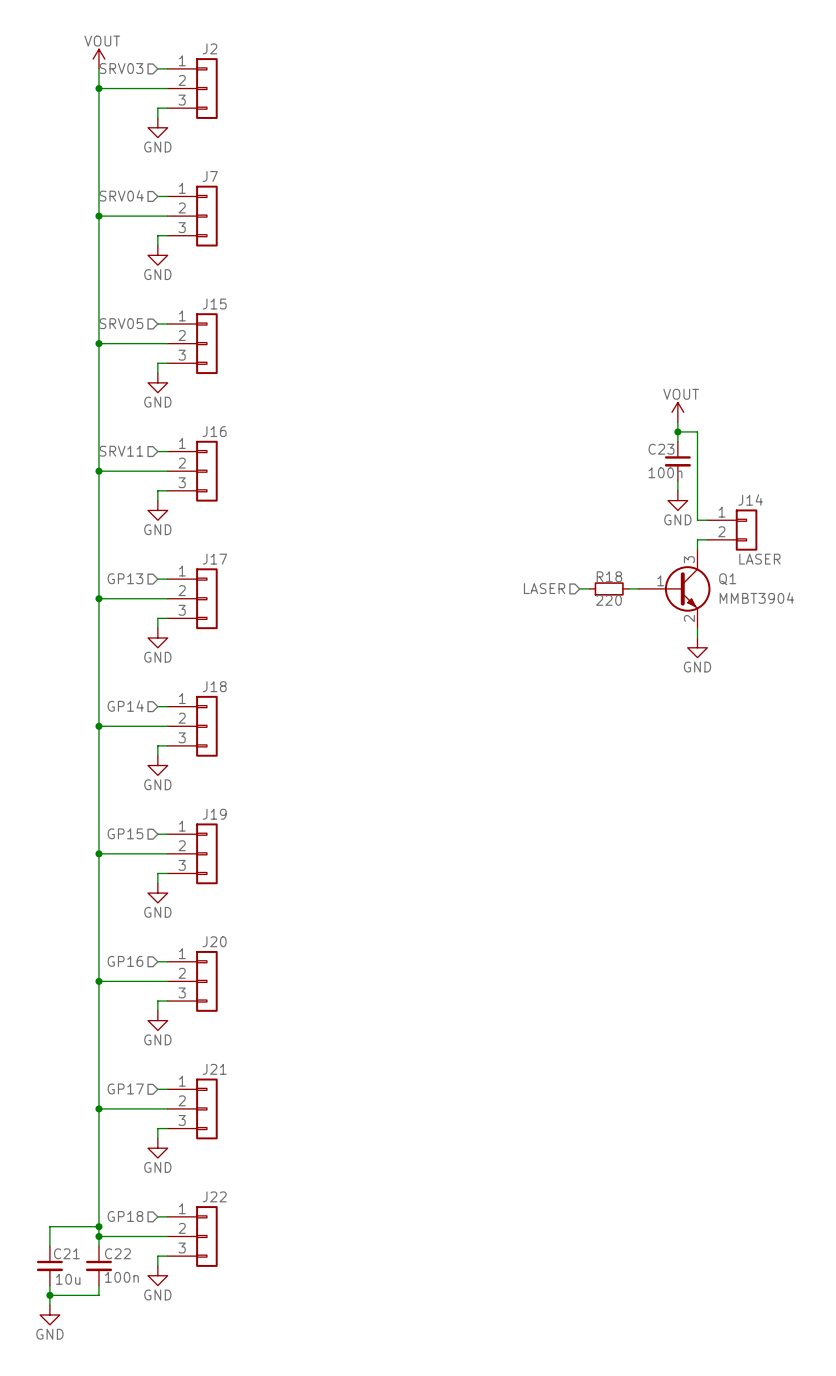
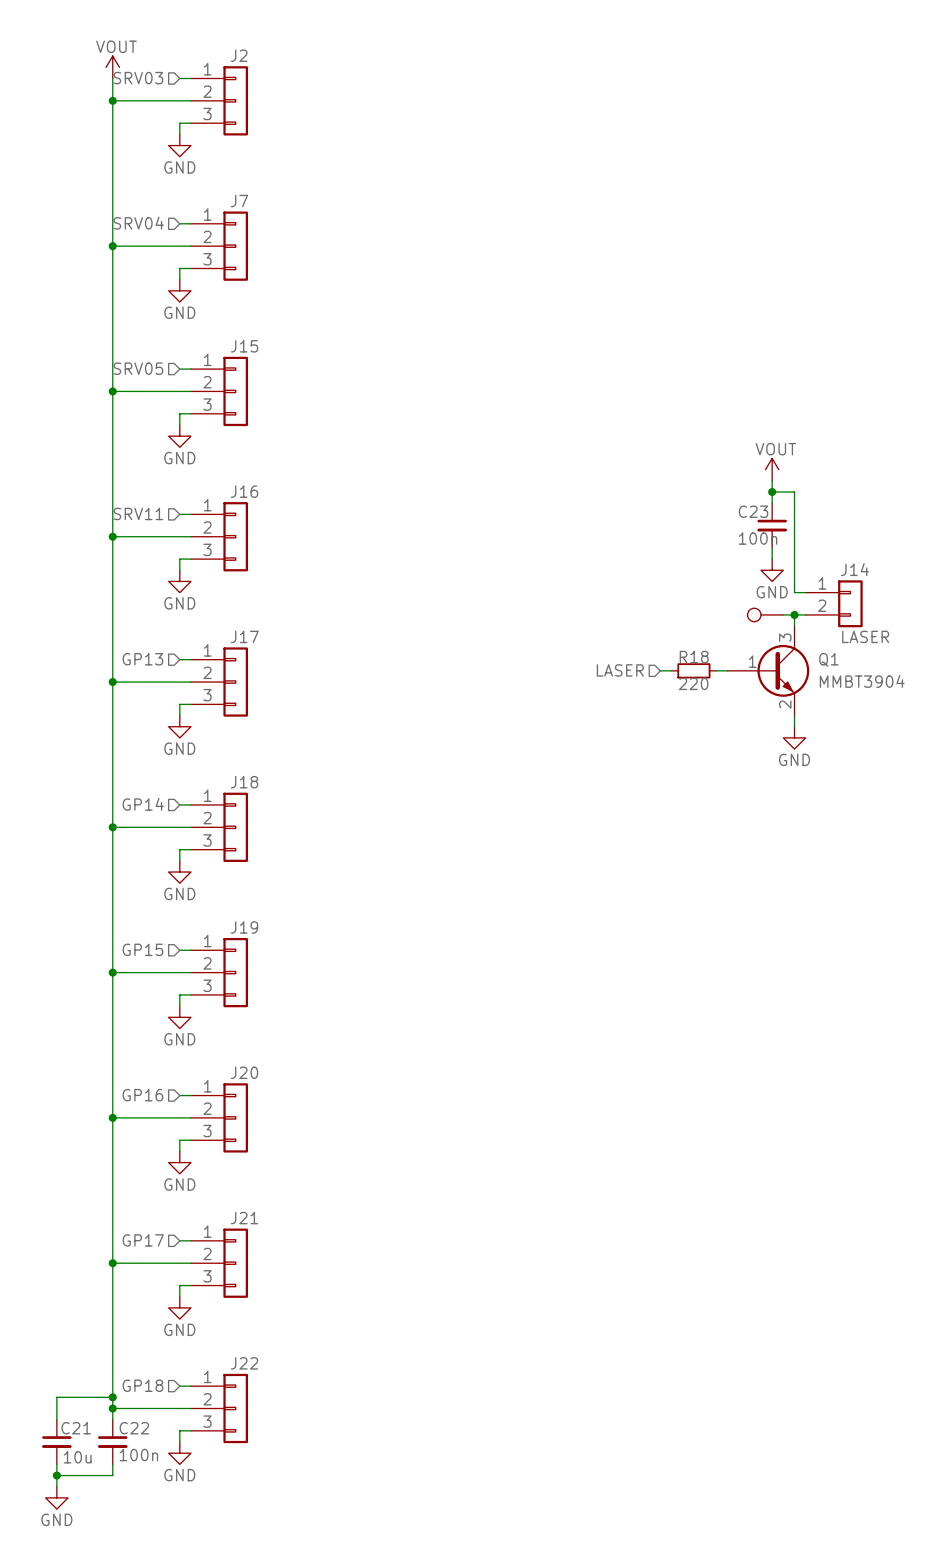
part: none -> (765, 614)
wire: none -> (783, 614) (794, 614)
junction: none -> (794, 614)

